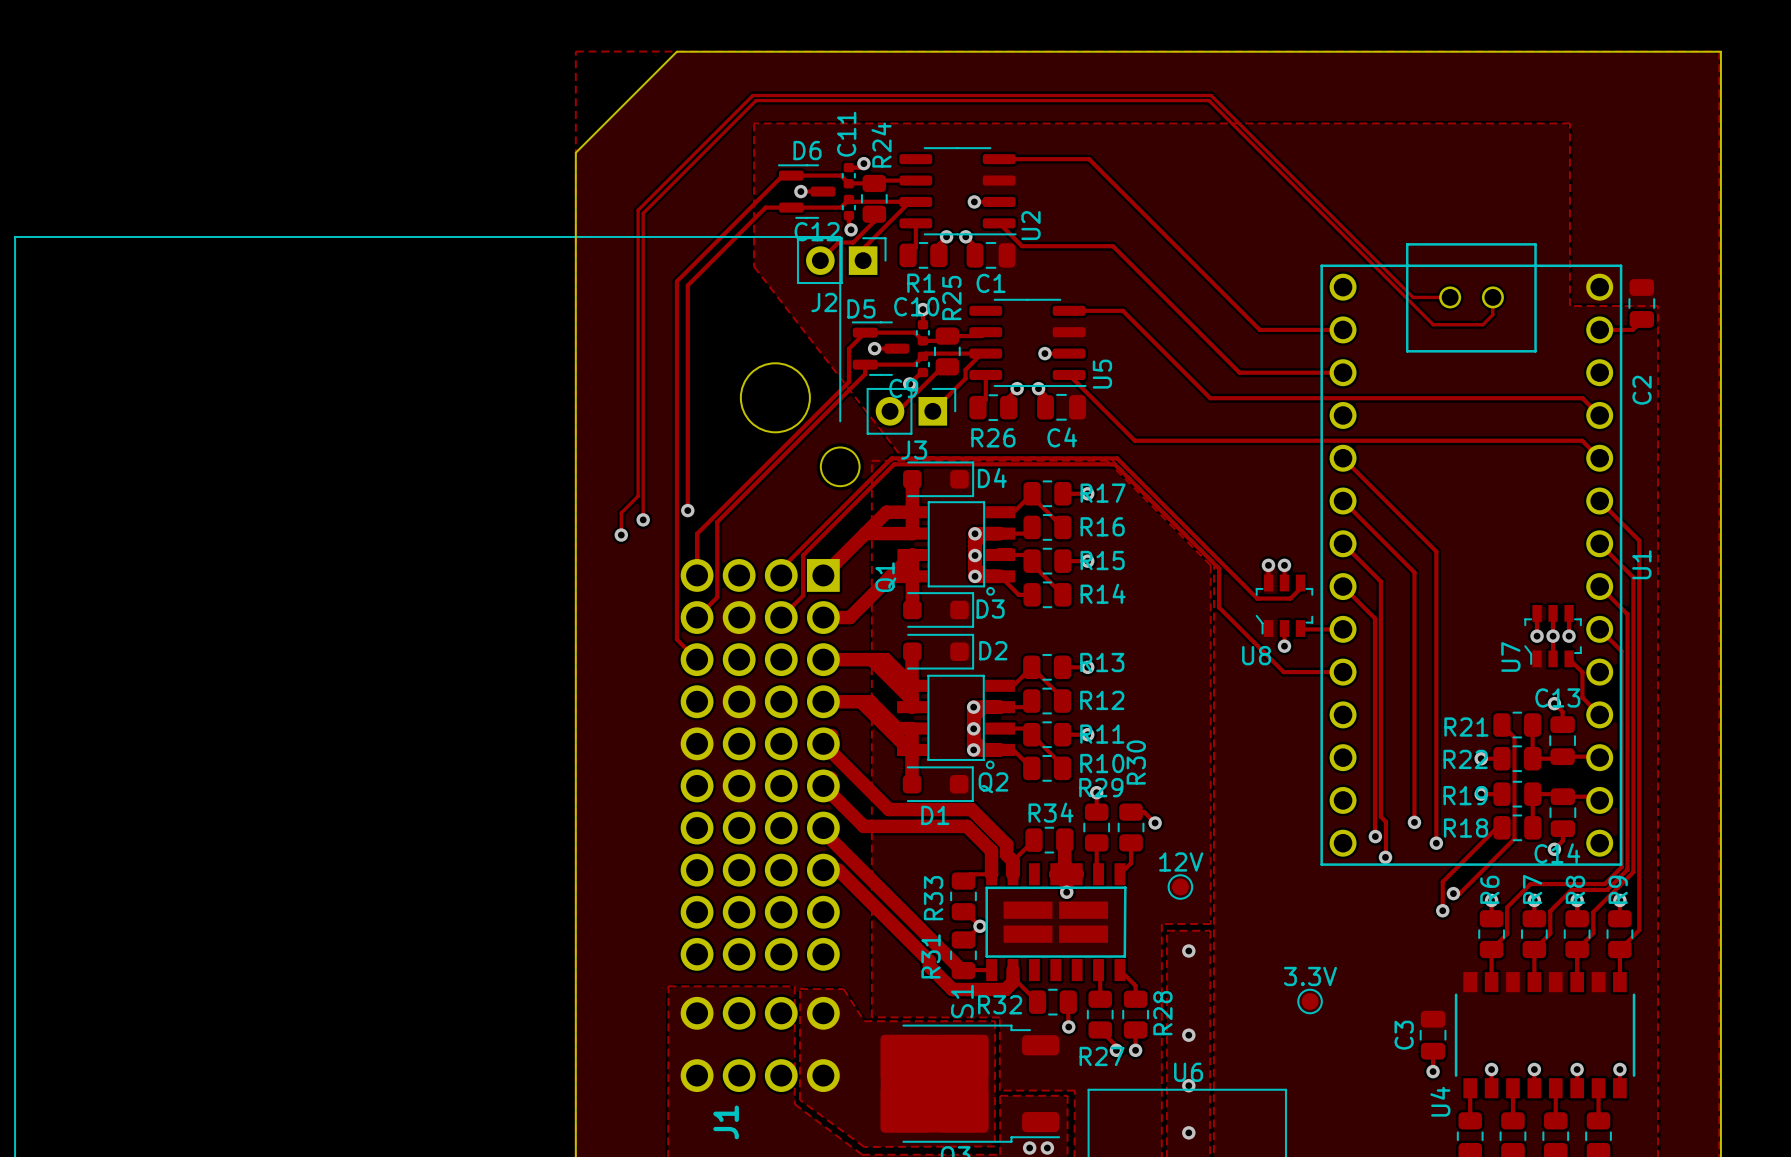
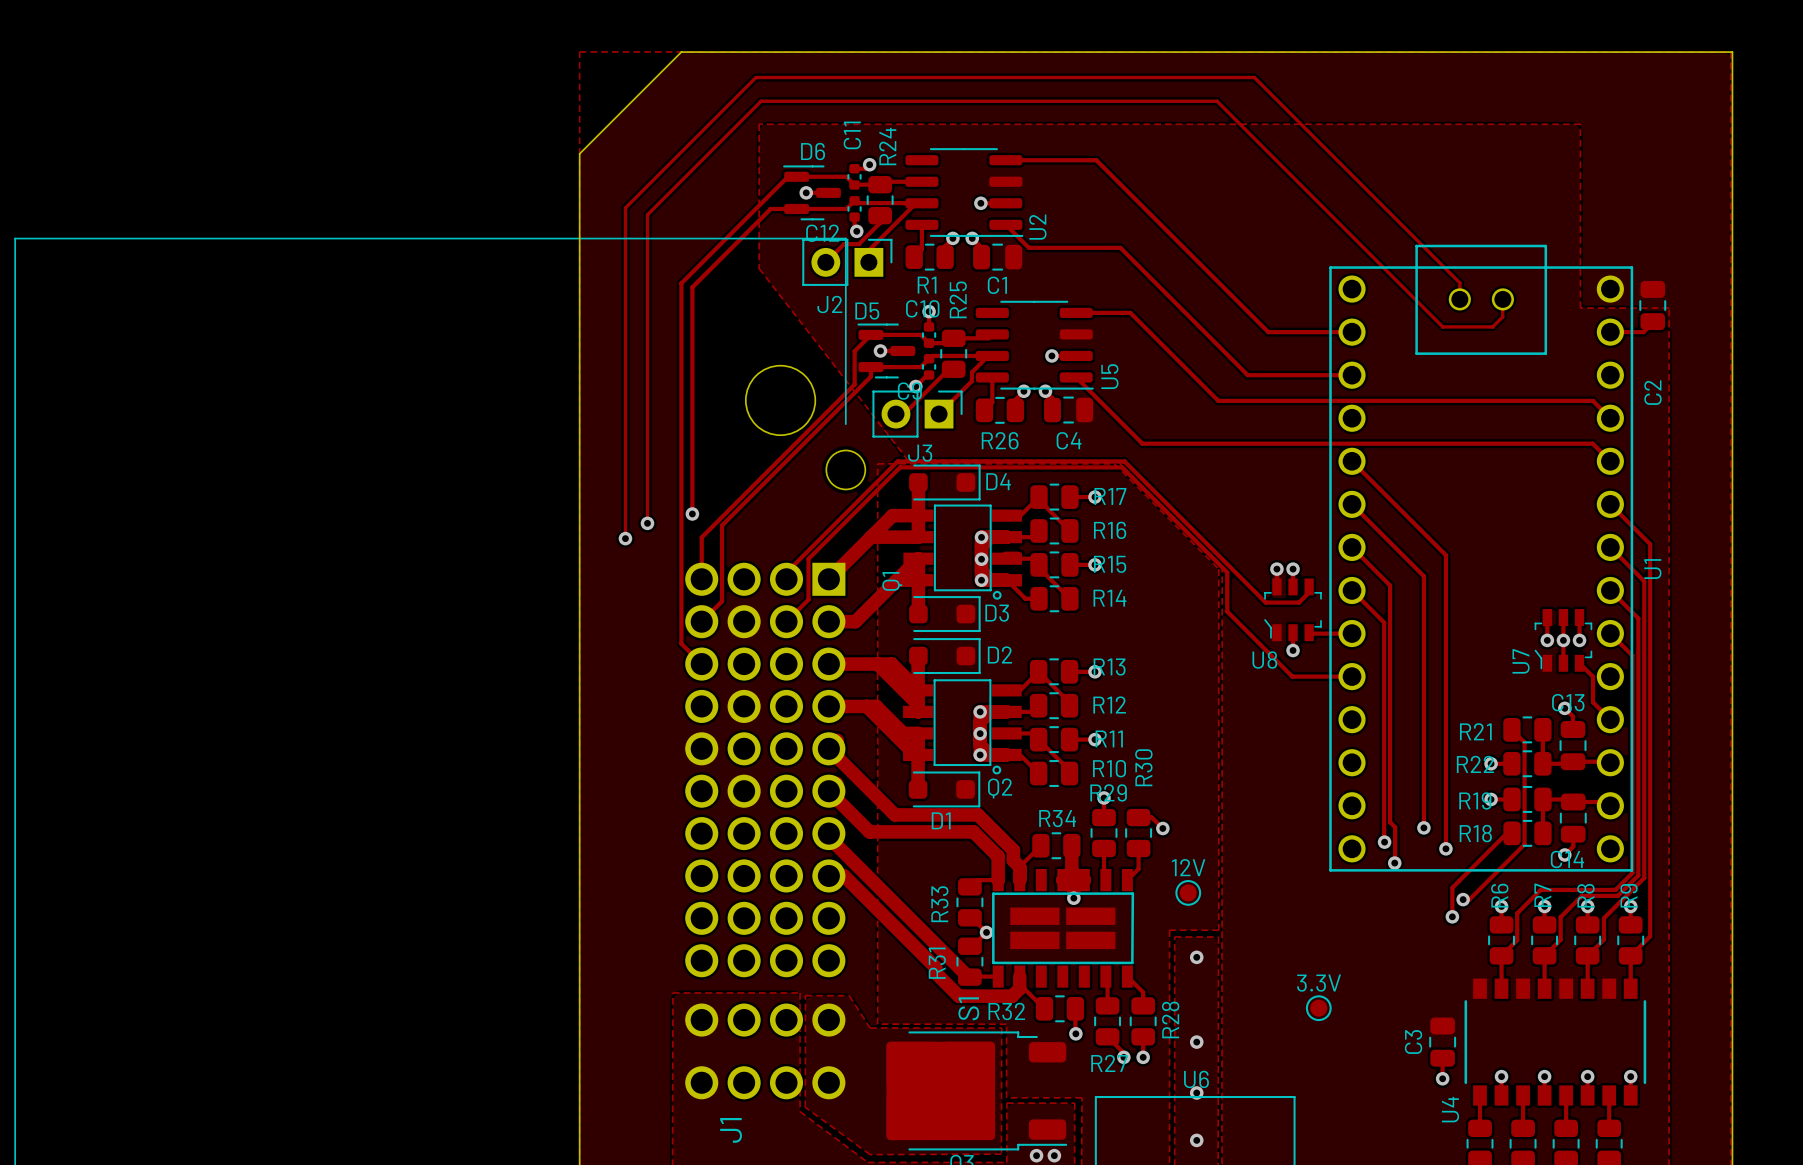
track: (1450, 297) (1413, 297) (1211, 95) (752, 95) (638, 210) (638, 496) (621, 512) -> (1459, 299) (1459, 282) (1254, 77) (755, 77) (625, 208) (625, 516)

